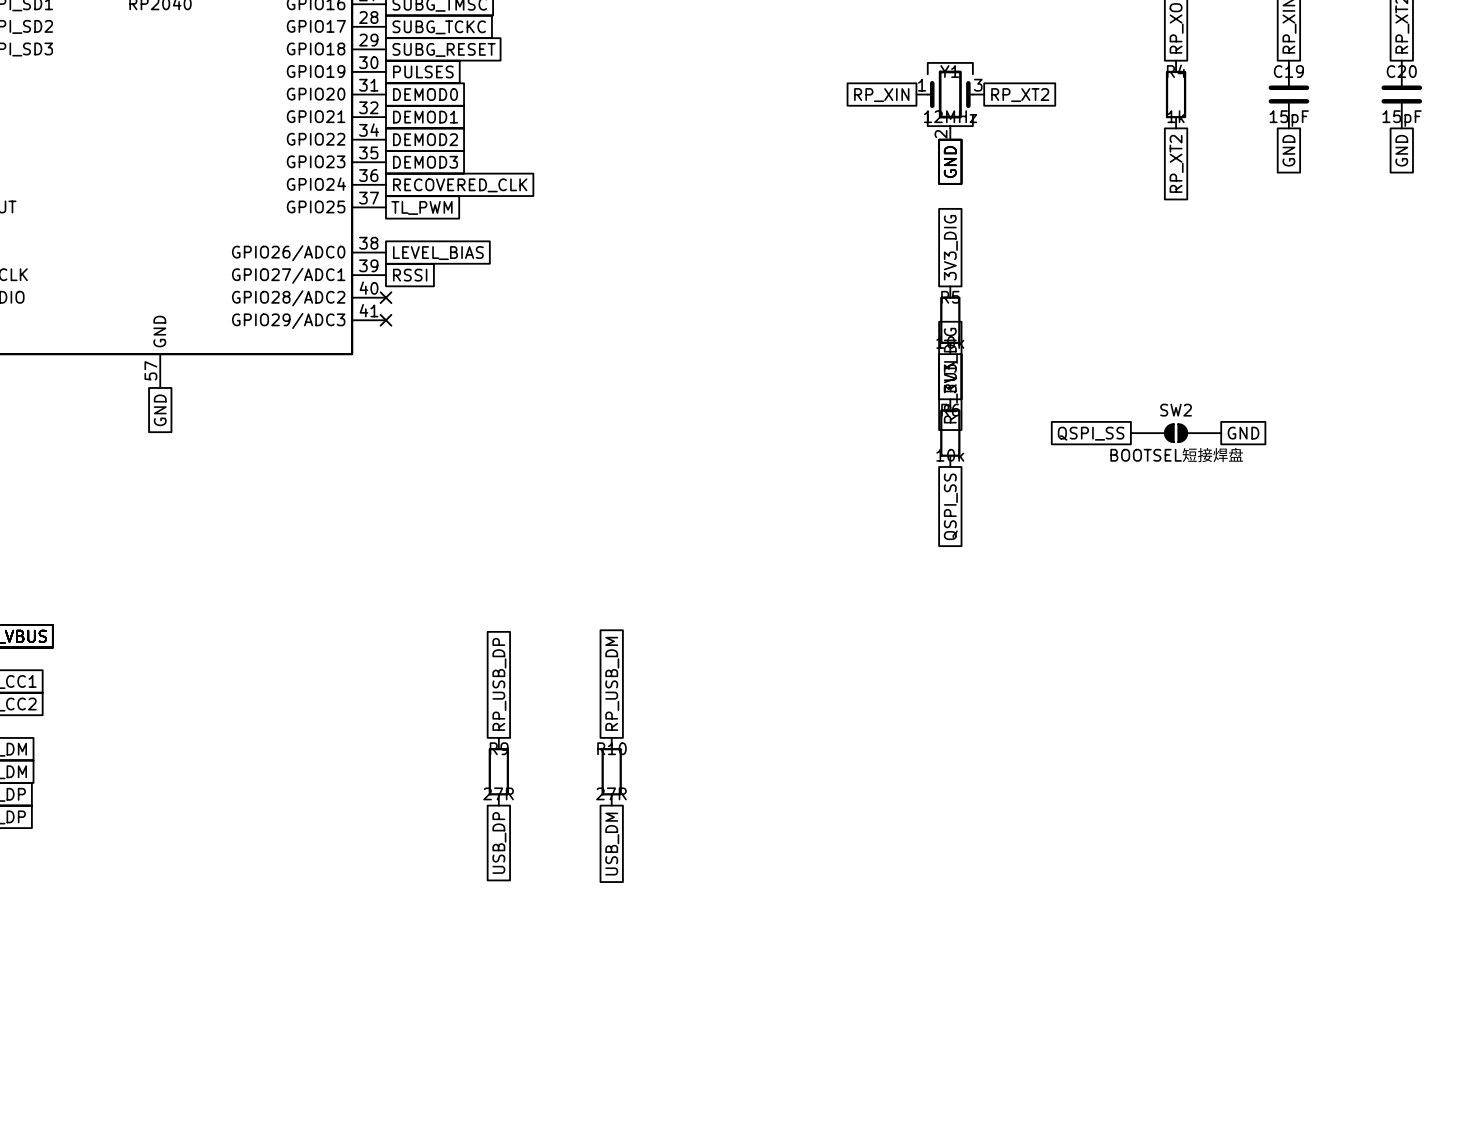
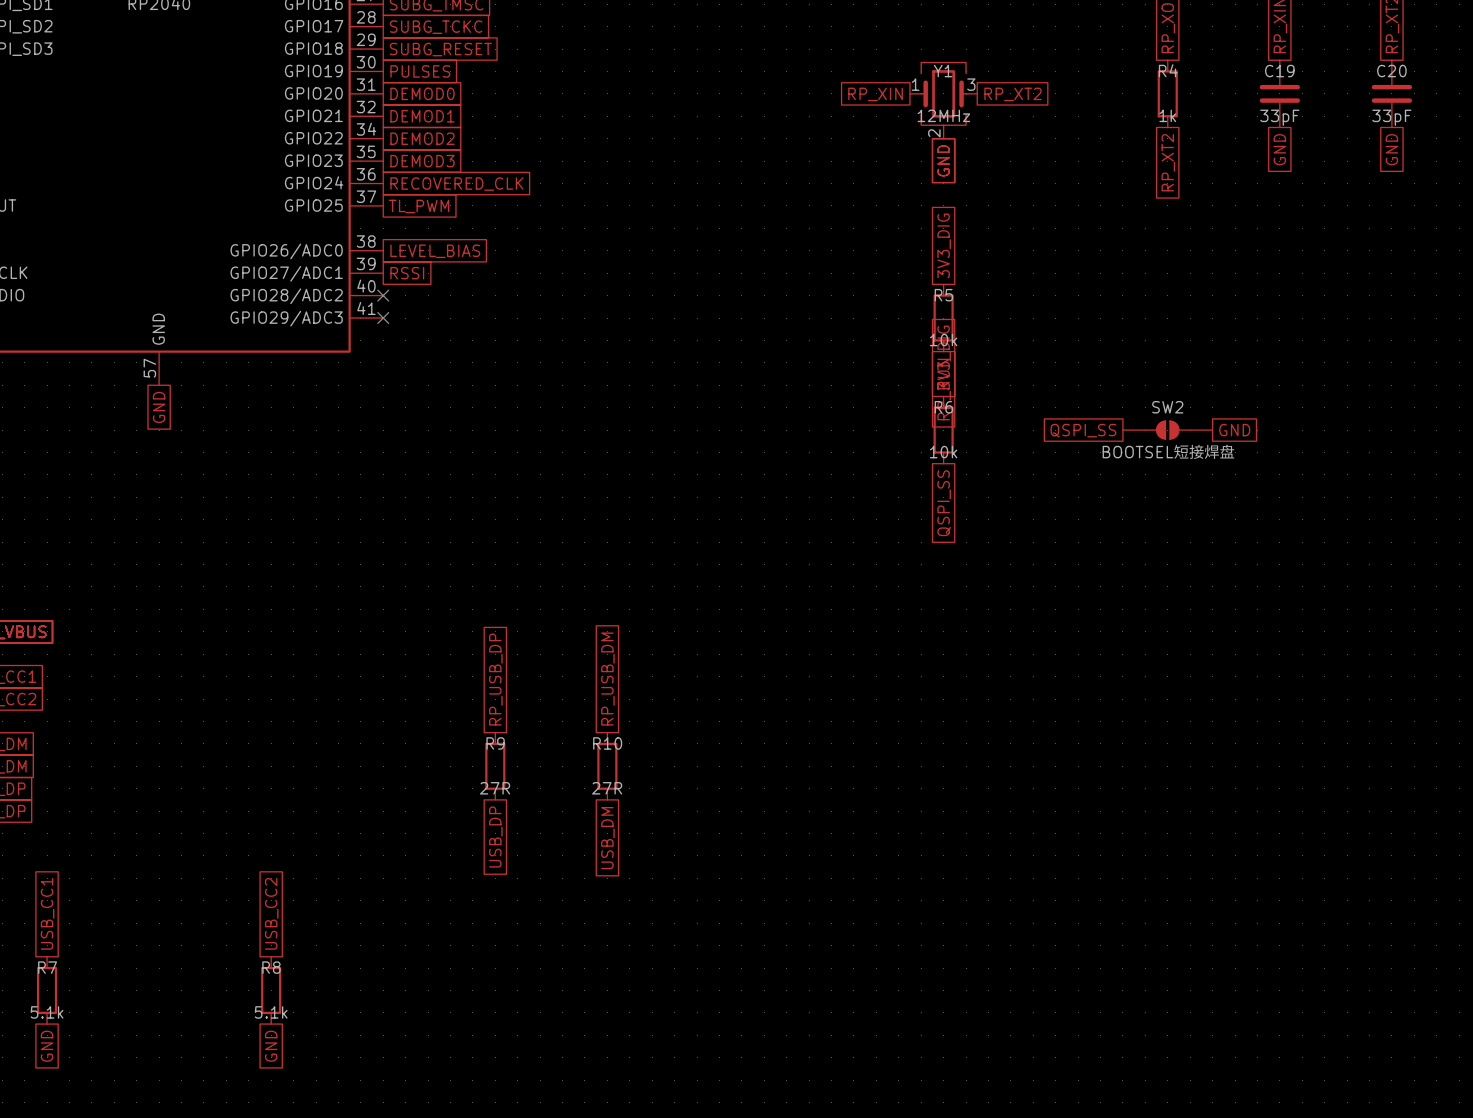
C19 value: 15pF (1289, 118) -> 33pF (1279, 117)
C20 value: 15pF (1402, 118) -> 33pF (1391, 117)
global label: none -> USB_CC1 (47, 913)
global label: none -> USB_CC2 (271, 913)
R7: none -> 5.1k (47, 990)
R8: none -> 5.1k (271, 990)
global label: none -> GND (47, 1046)
global label: none -> GND (271, 1046)

